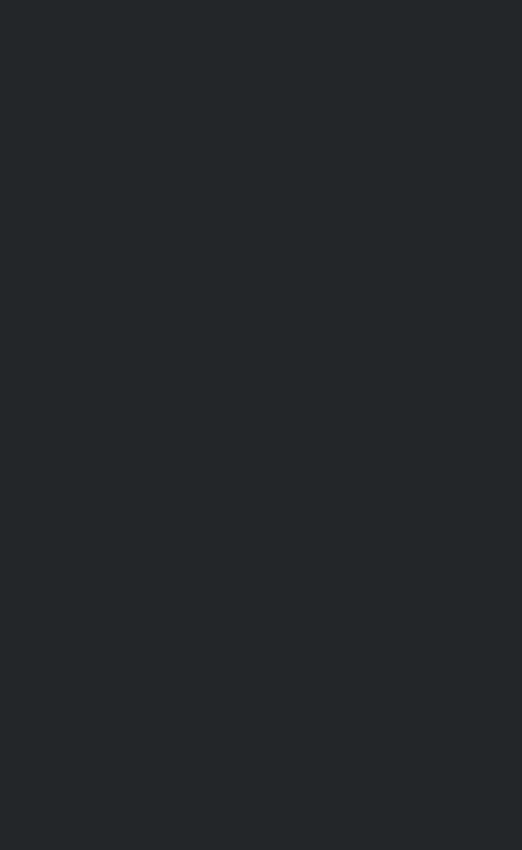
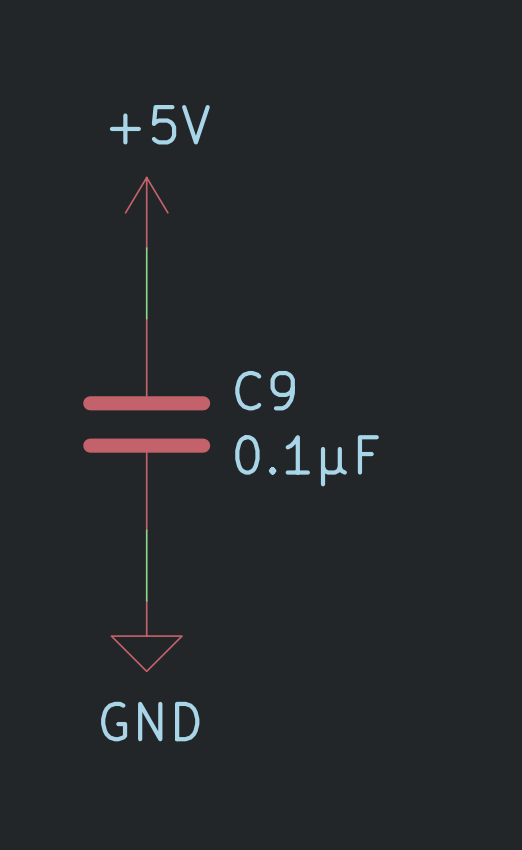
power symbol: none -> +5V (146, 212)
wire: none -> (146, 248) (146, 318)
C9: none -> 0.1µF (146, 424)
wire: none -> (146, 530) (146, 600)
power symbol: none -> GND (146, 636)

